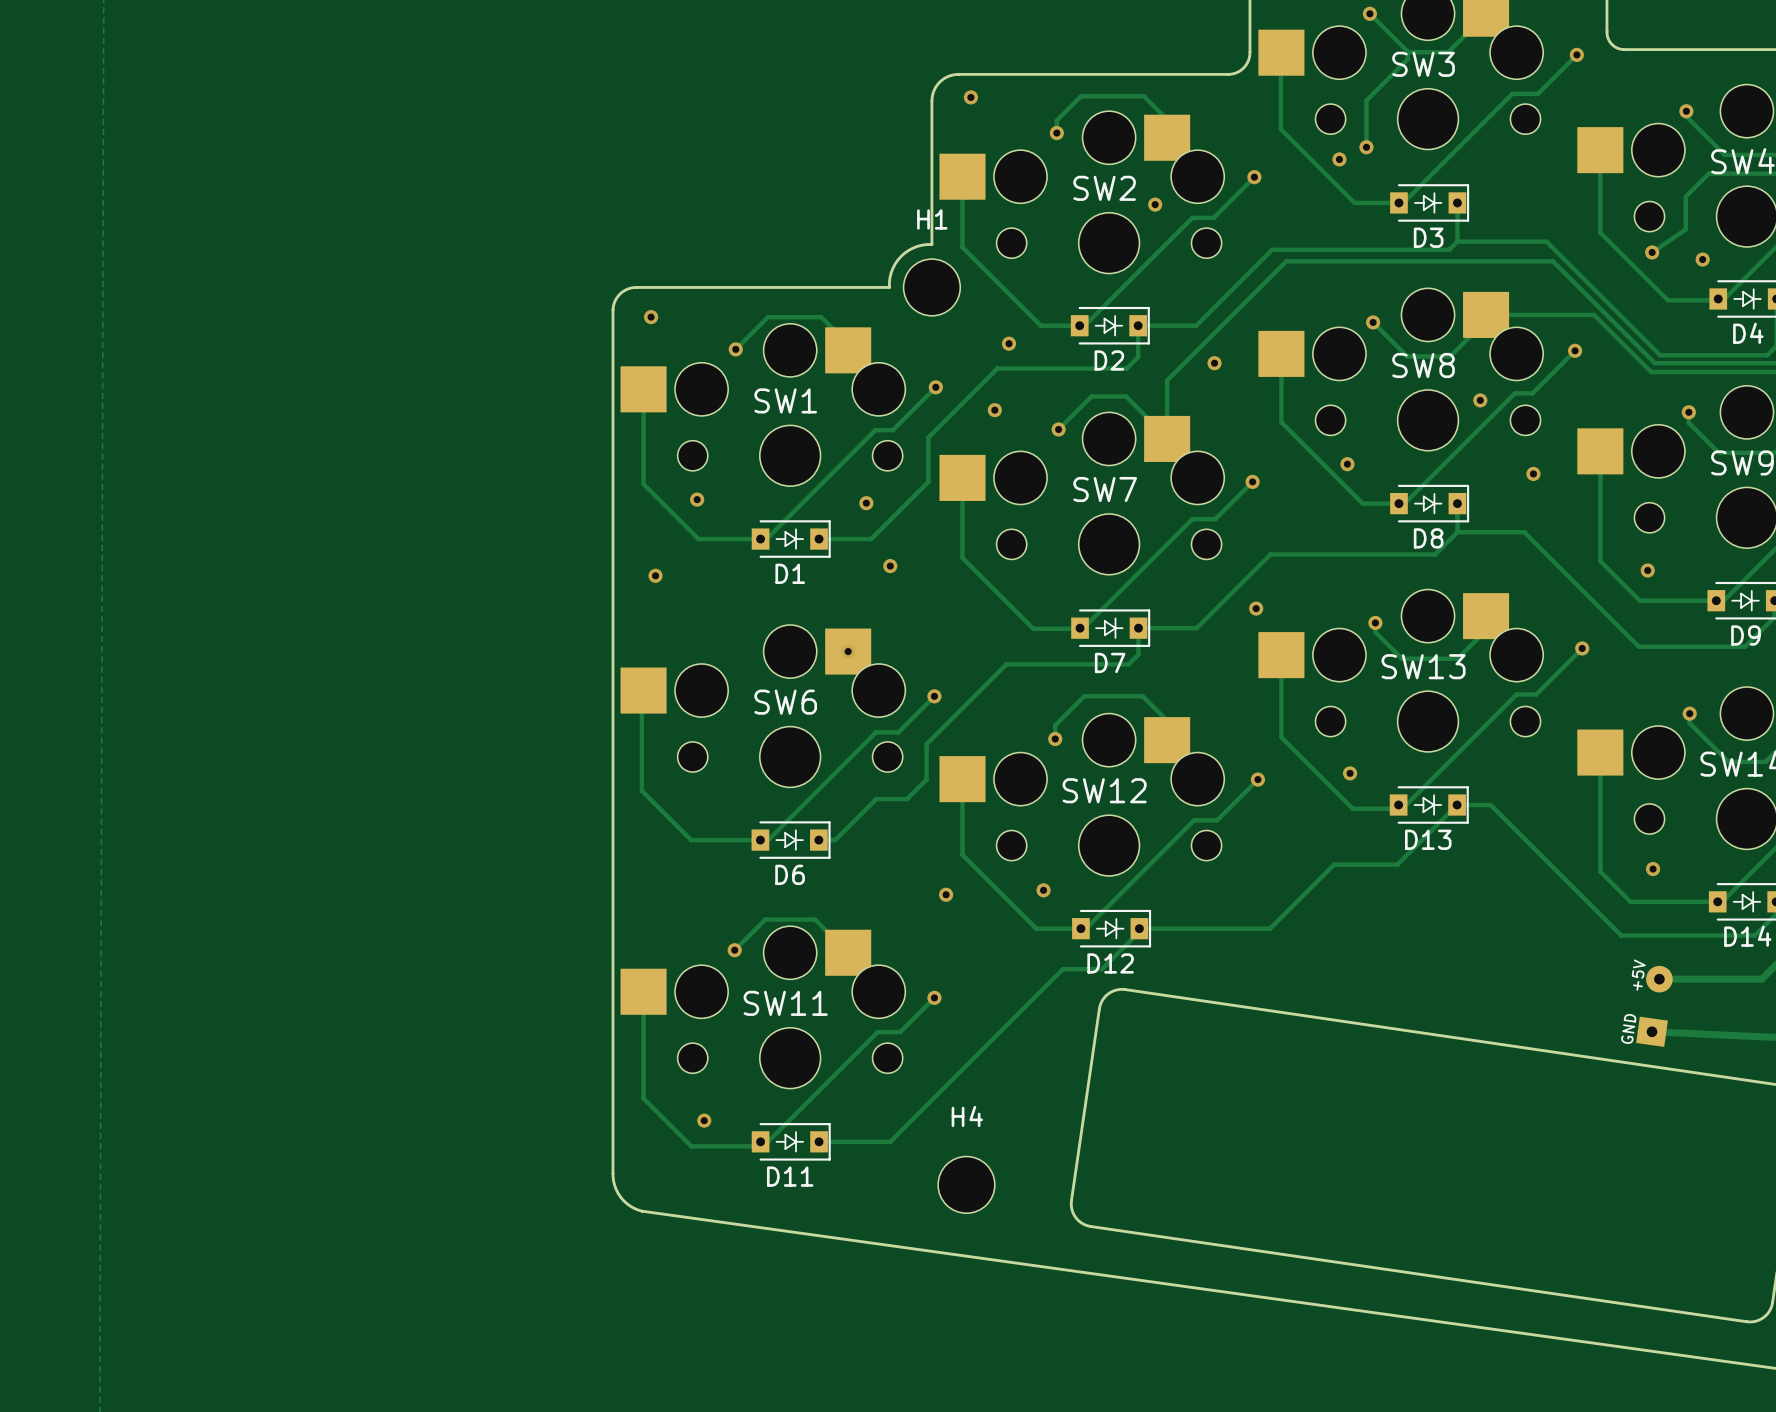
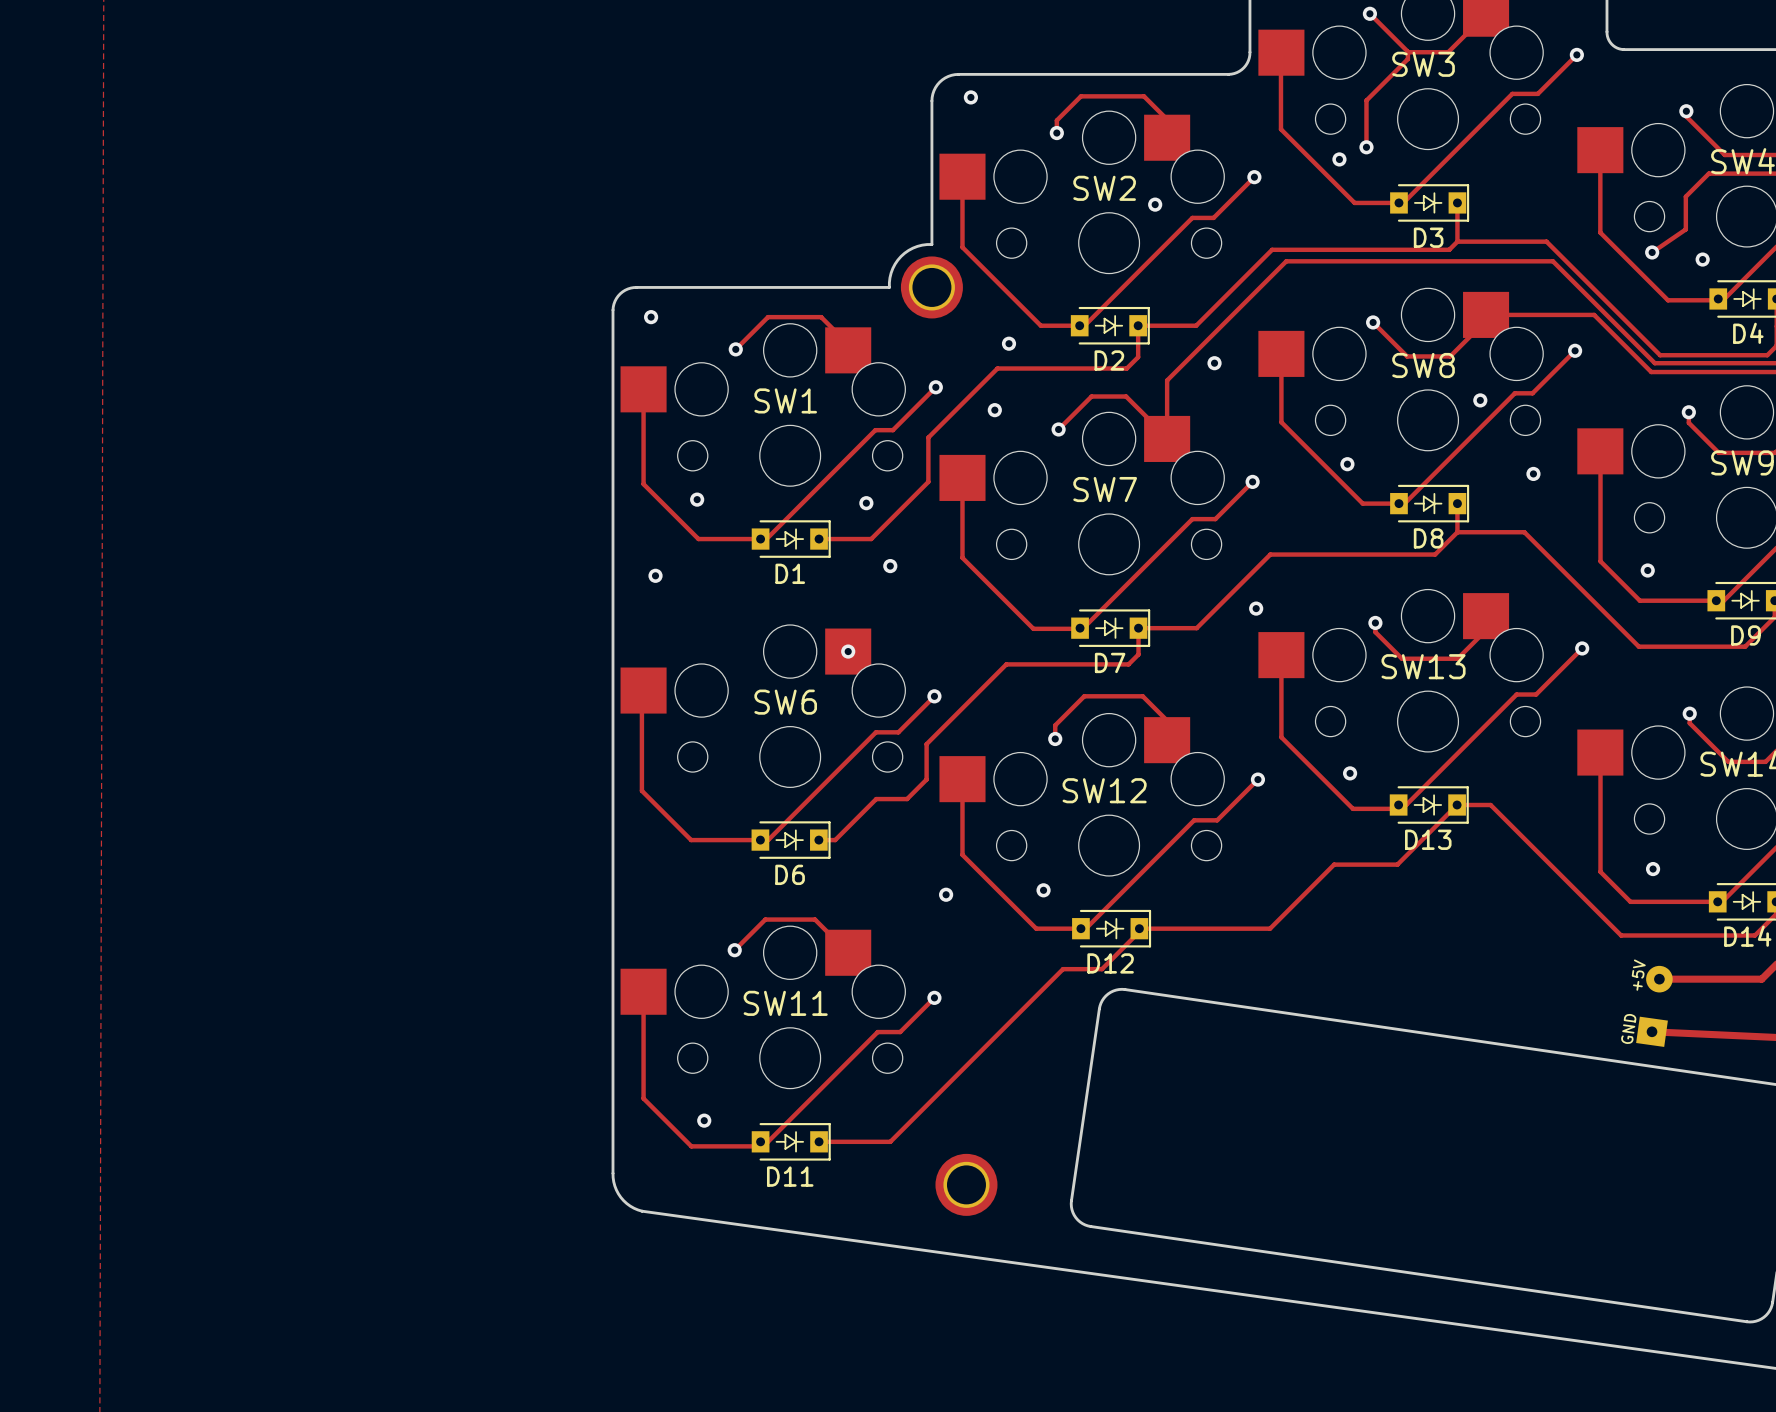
H1: (931, 287) -> none
part: none -> (931, 287)
H4: (966, 1184) -> none
part: none -> (966, 1184)

